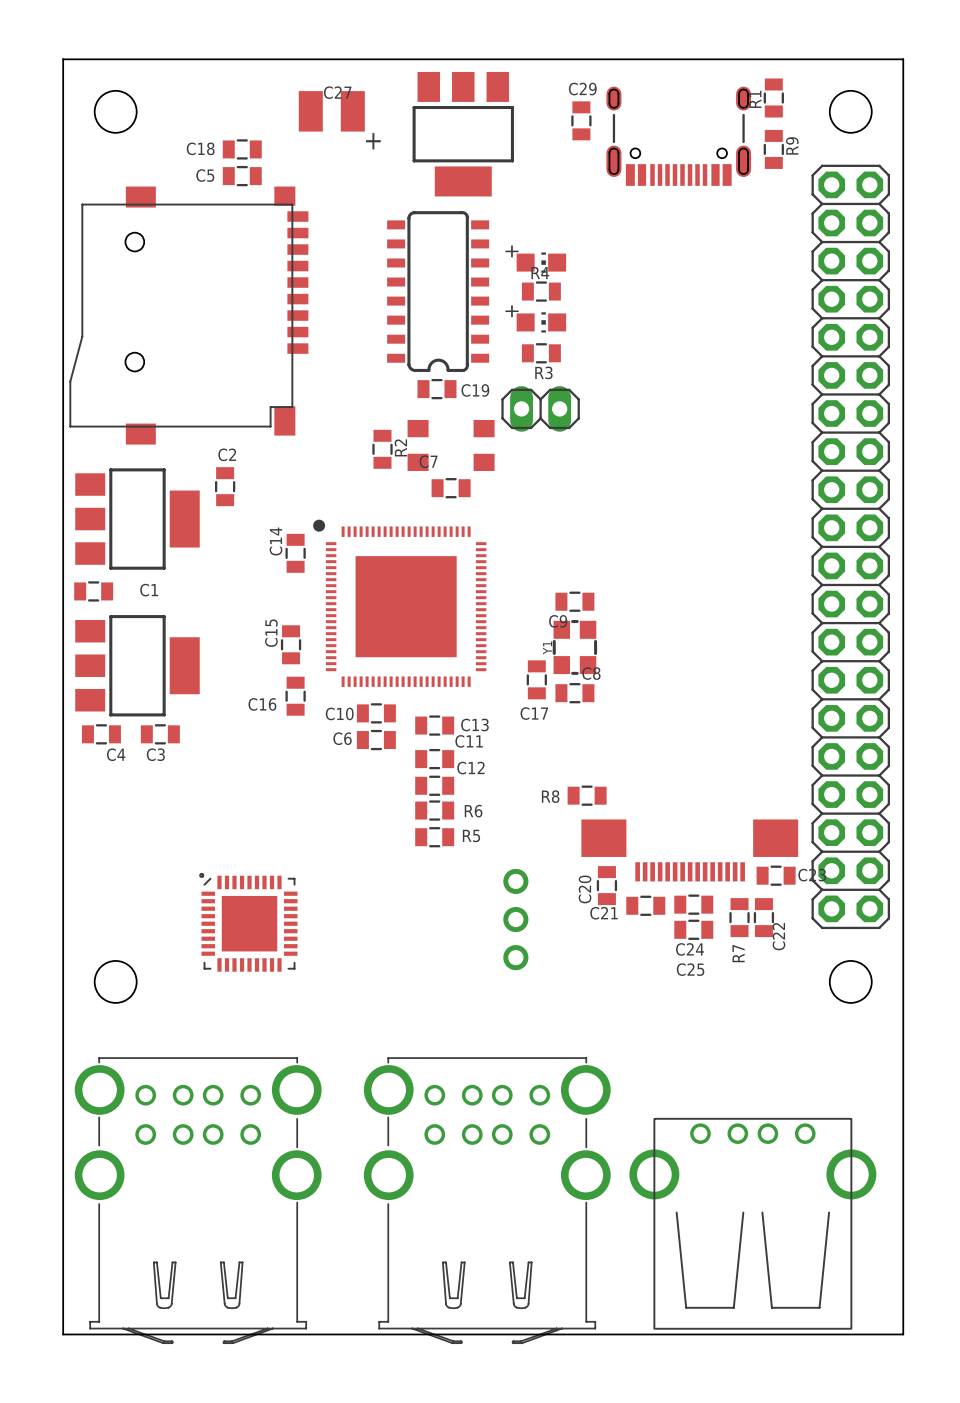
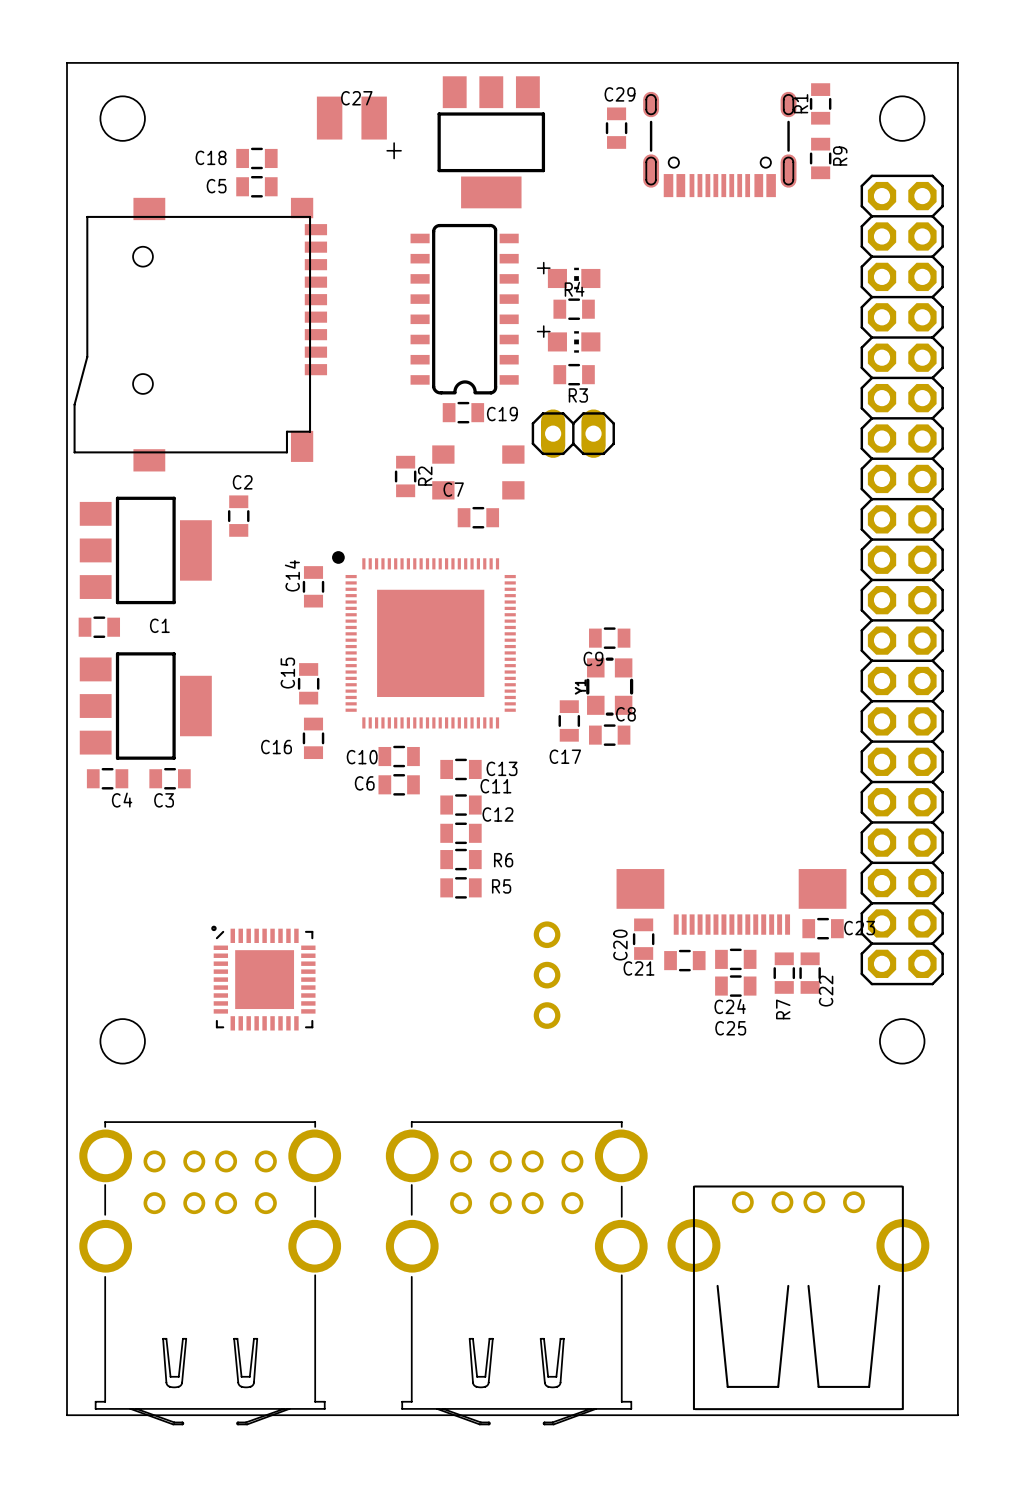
R8: (587, 795) -> none

